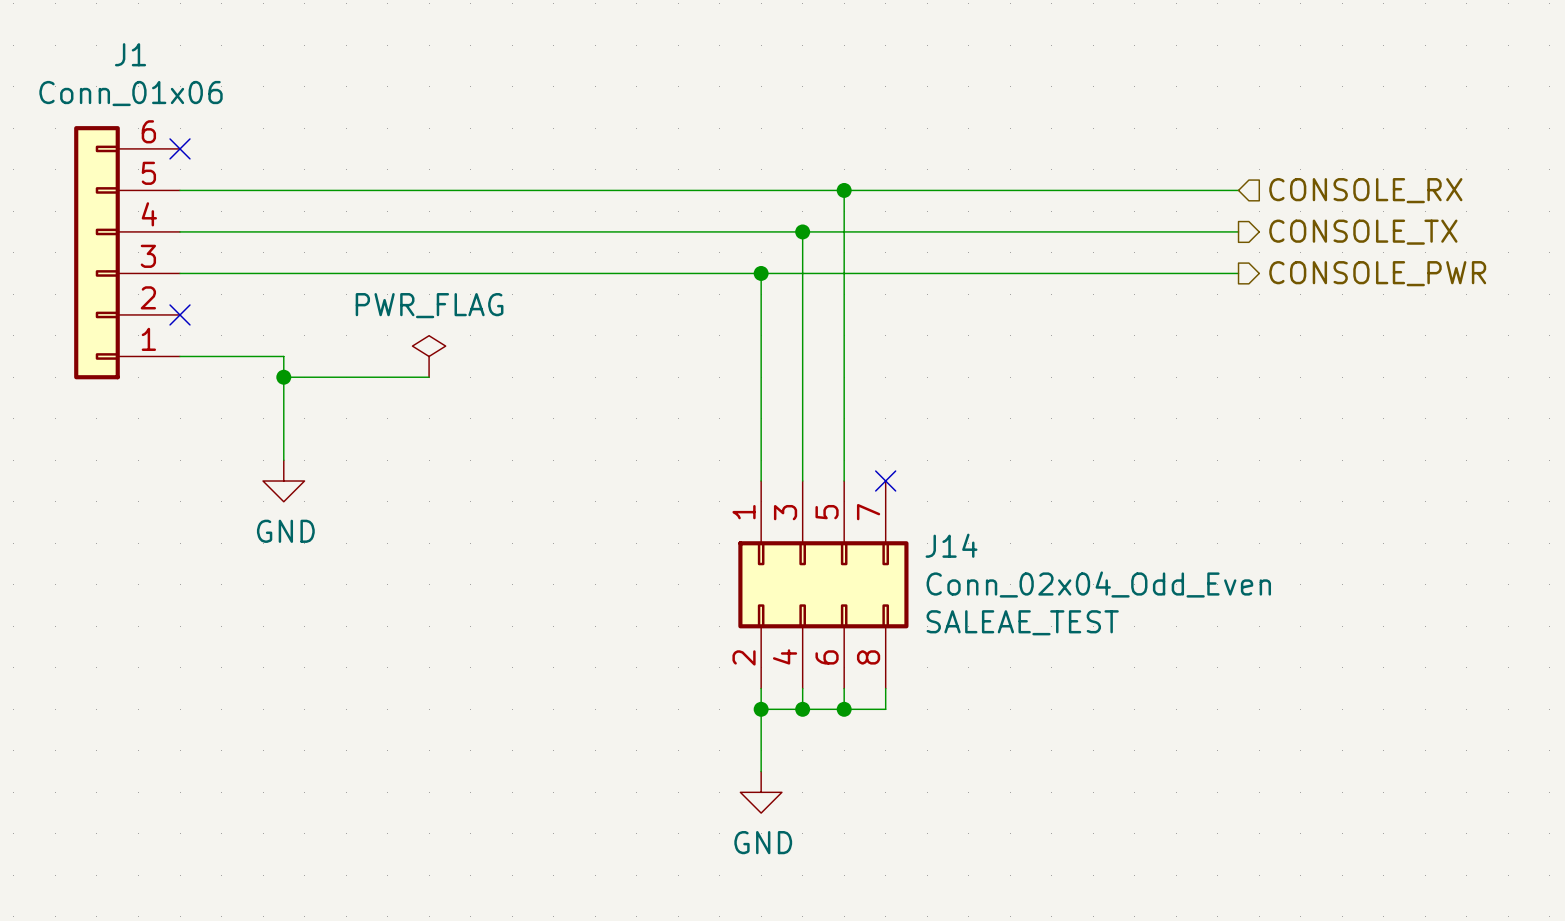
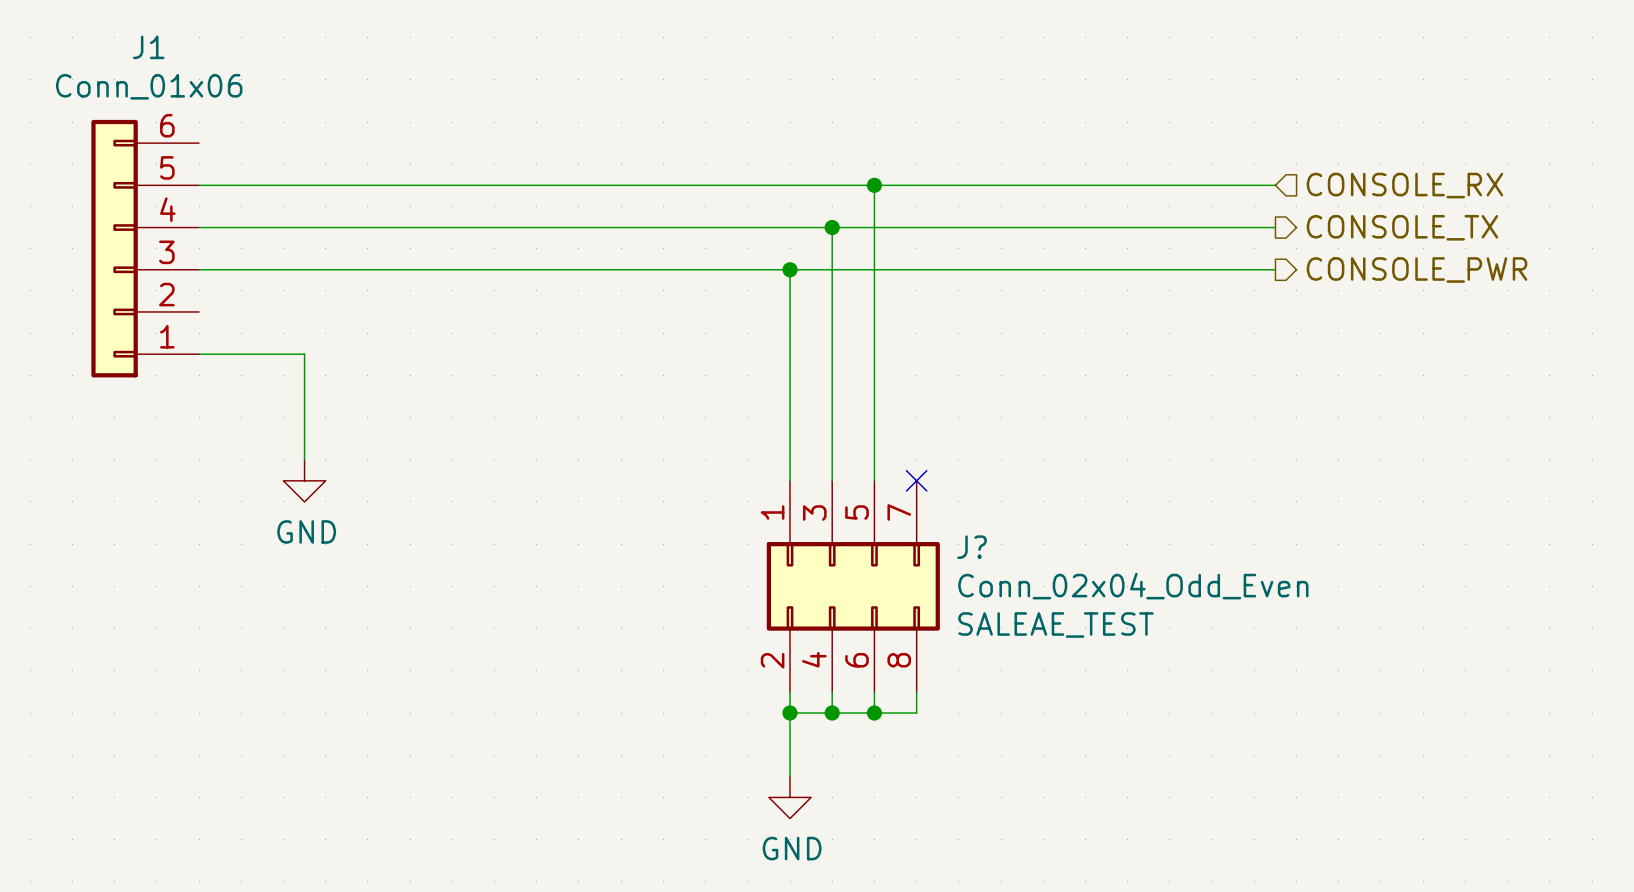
no-connect mark: (180, 148) -> none
no-connect mark: (180, 314) -> none
power symbol: PWR_FLAG (429, 356) -> none
wire: (283, 377) (429, 377) -> none
junction: (283, 377) -> none
J14 name: J14 (951, 545) -> J? (972, 547)

